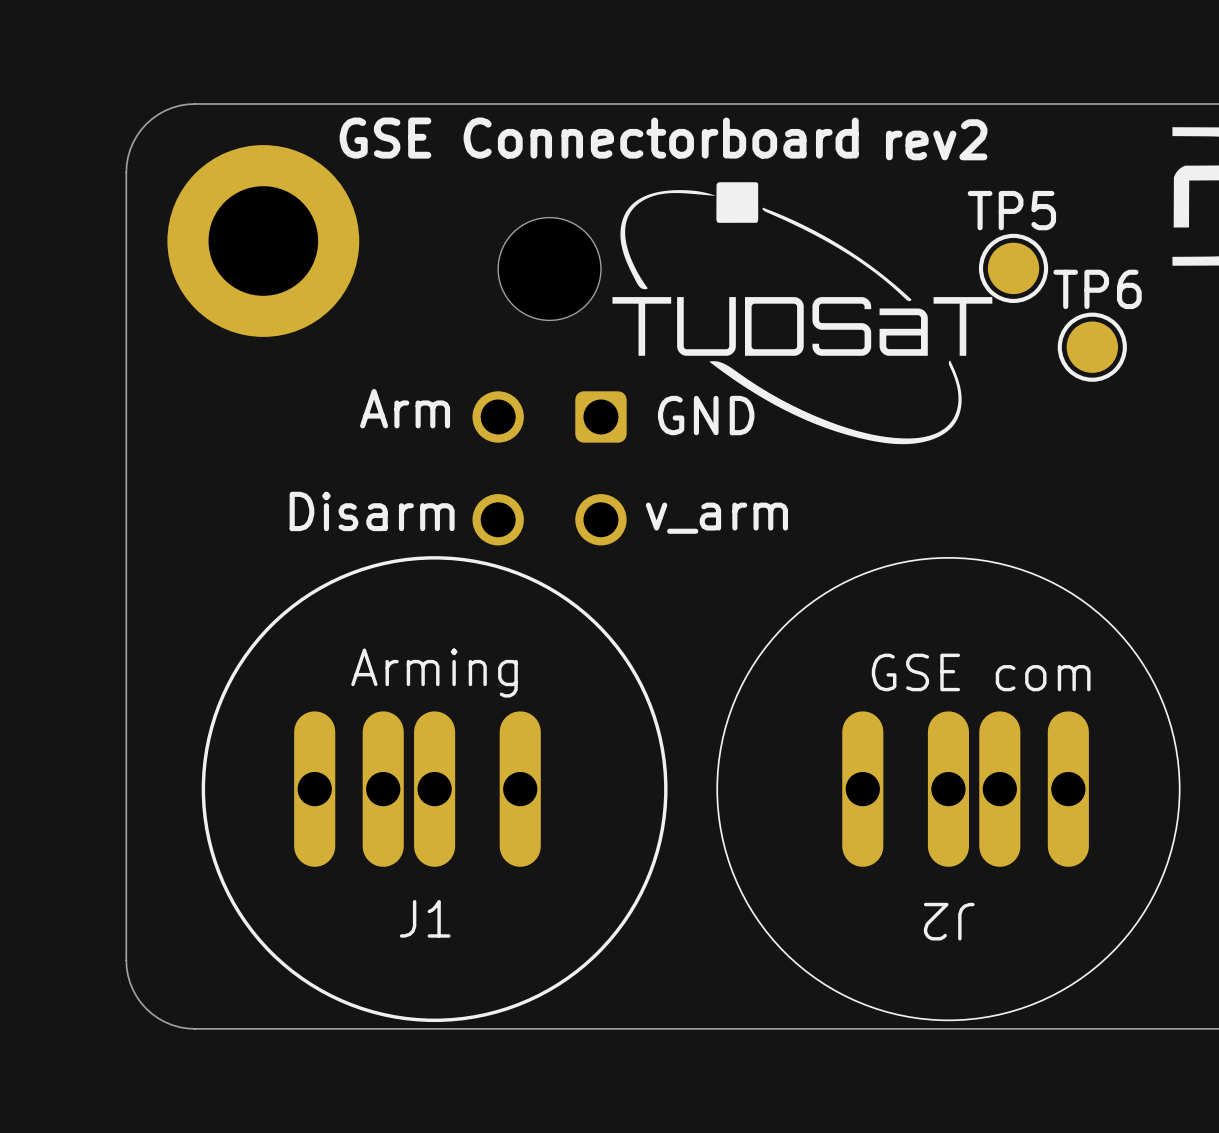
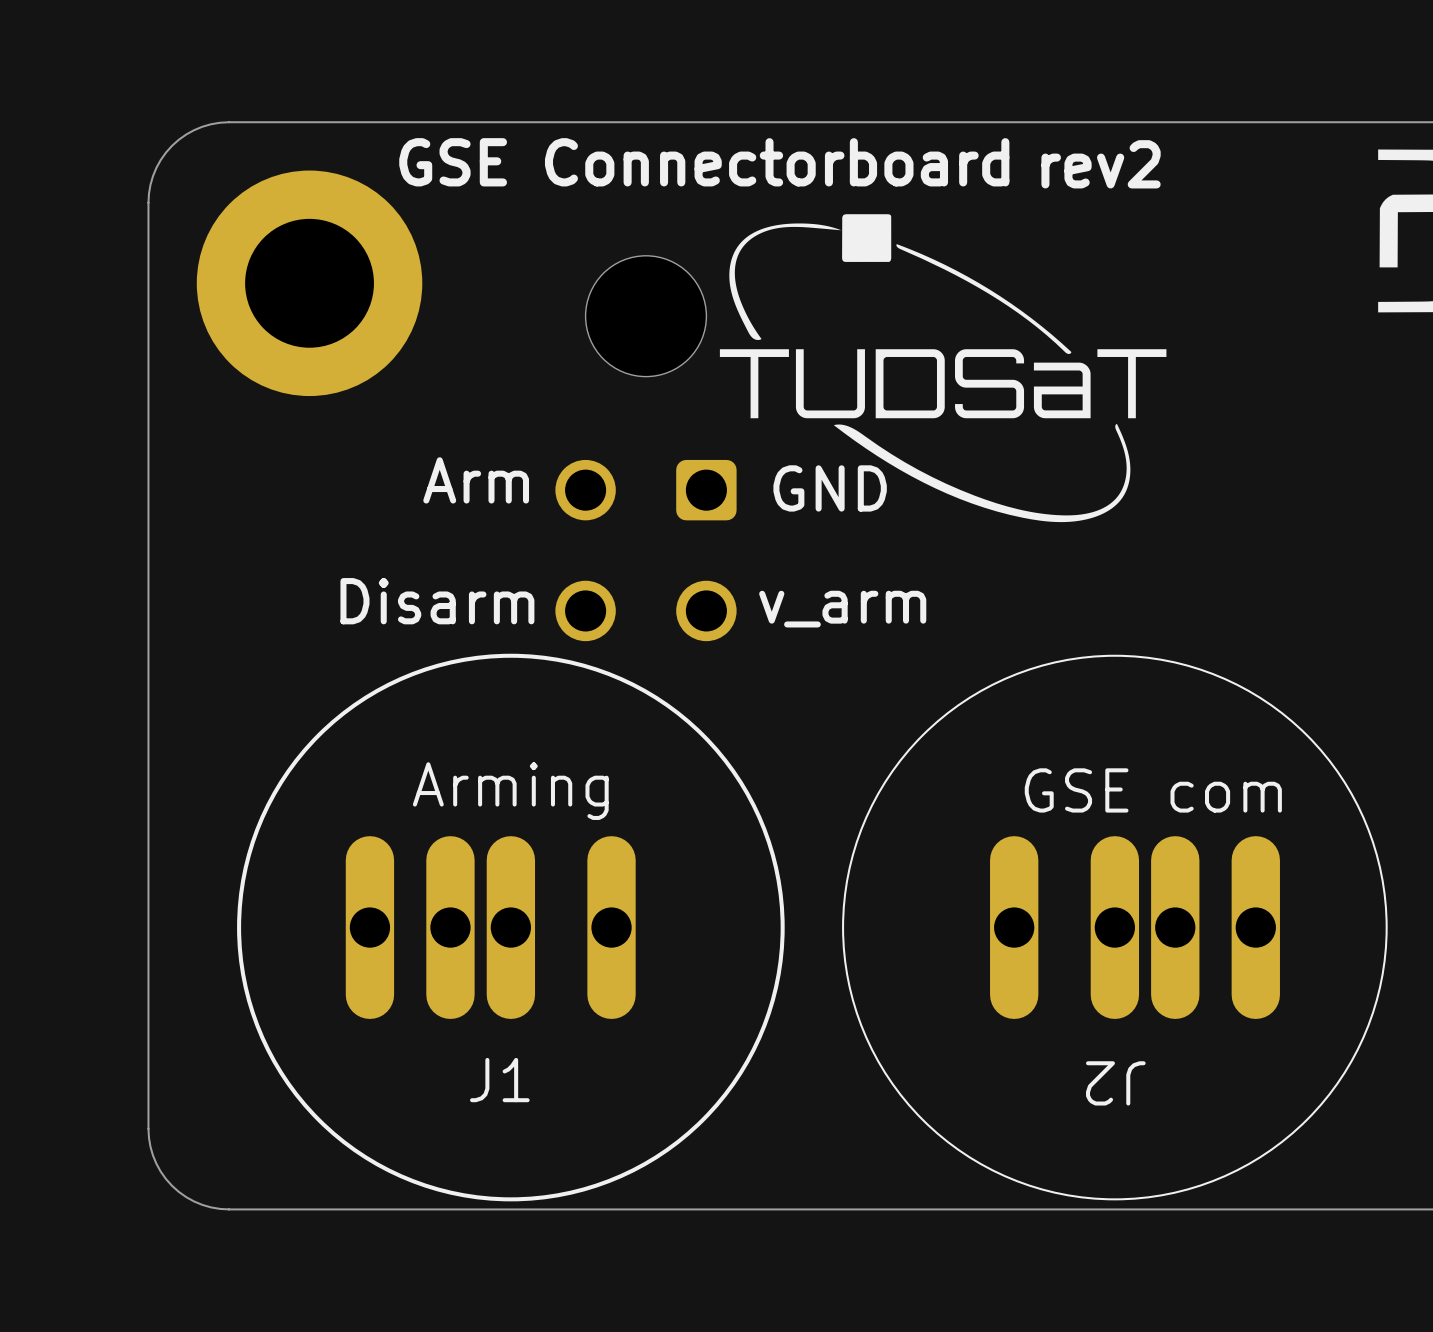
TP5: (1013, 268) -> none
TP6: (1092, 347) -> none

